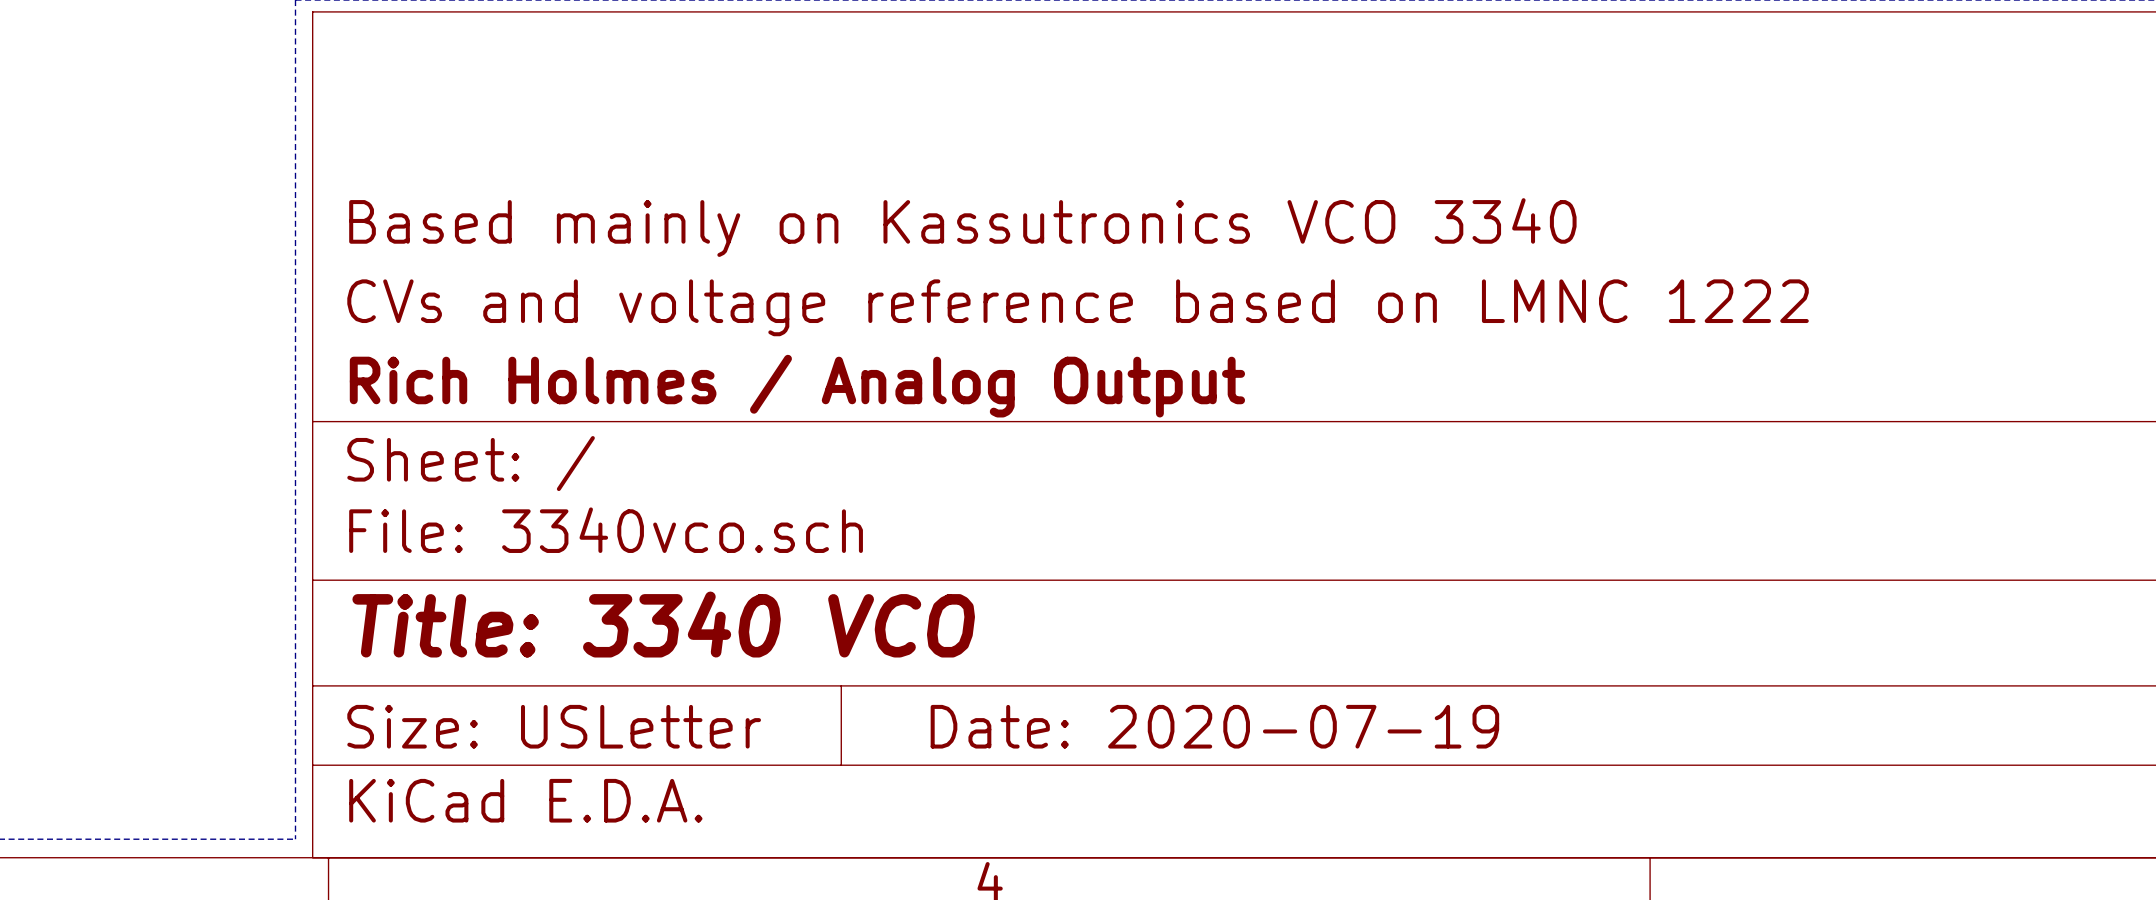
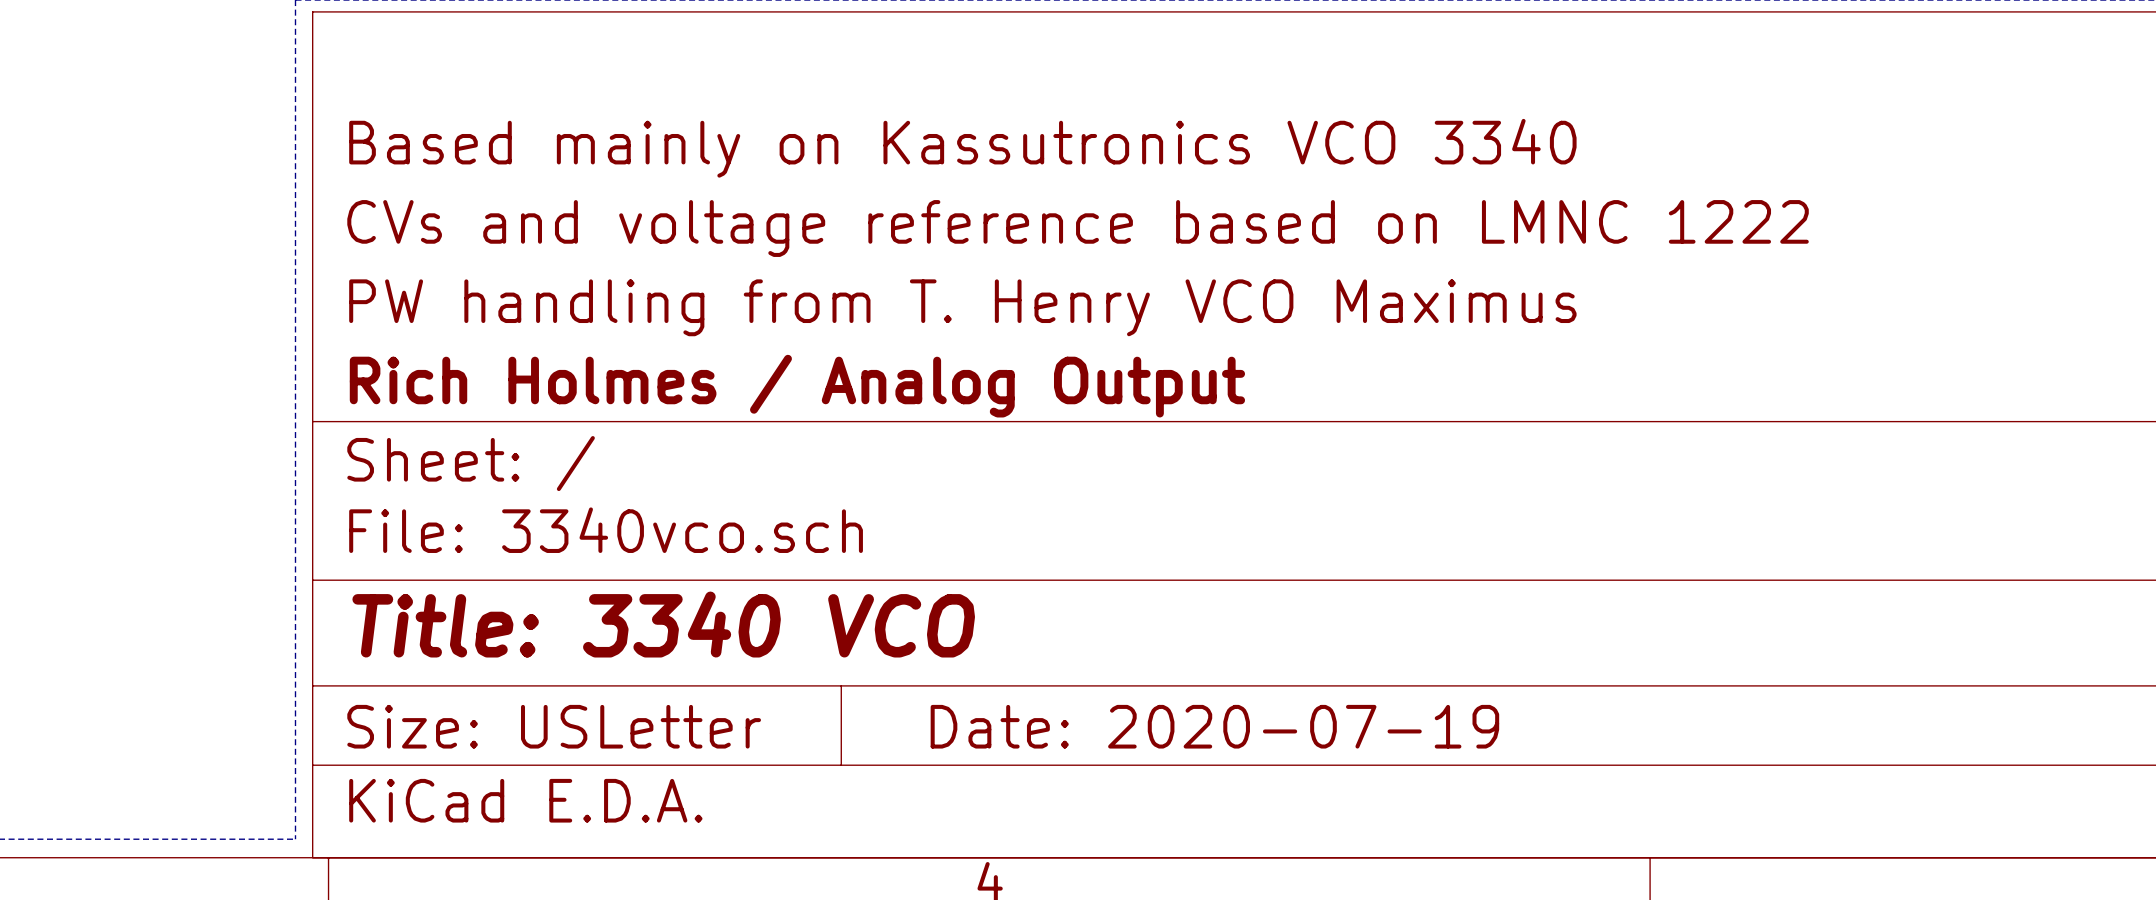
title block: none -> Based mainly on Kassutronics VCO 3340 (962, 148)
title block: Based mainly on Kassutronics VCO 3340 (962, 227) -> CVs and voltage reference based on LMNC 1222 (1078, 228)
title block: CVs and voltage reference based on LMNC 1222 (1078, 307) -> PW handling from T. Henry VCO Maximus (962, 307)

